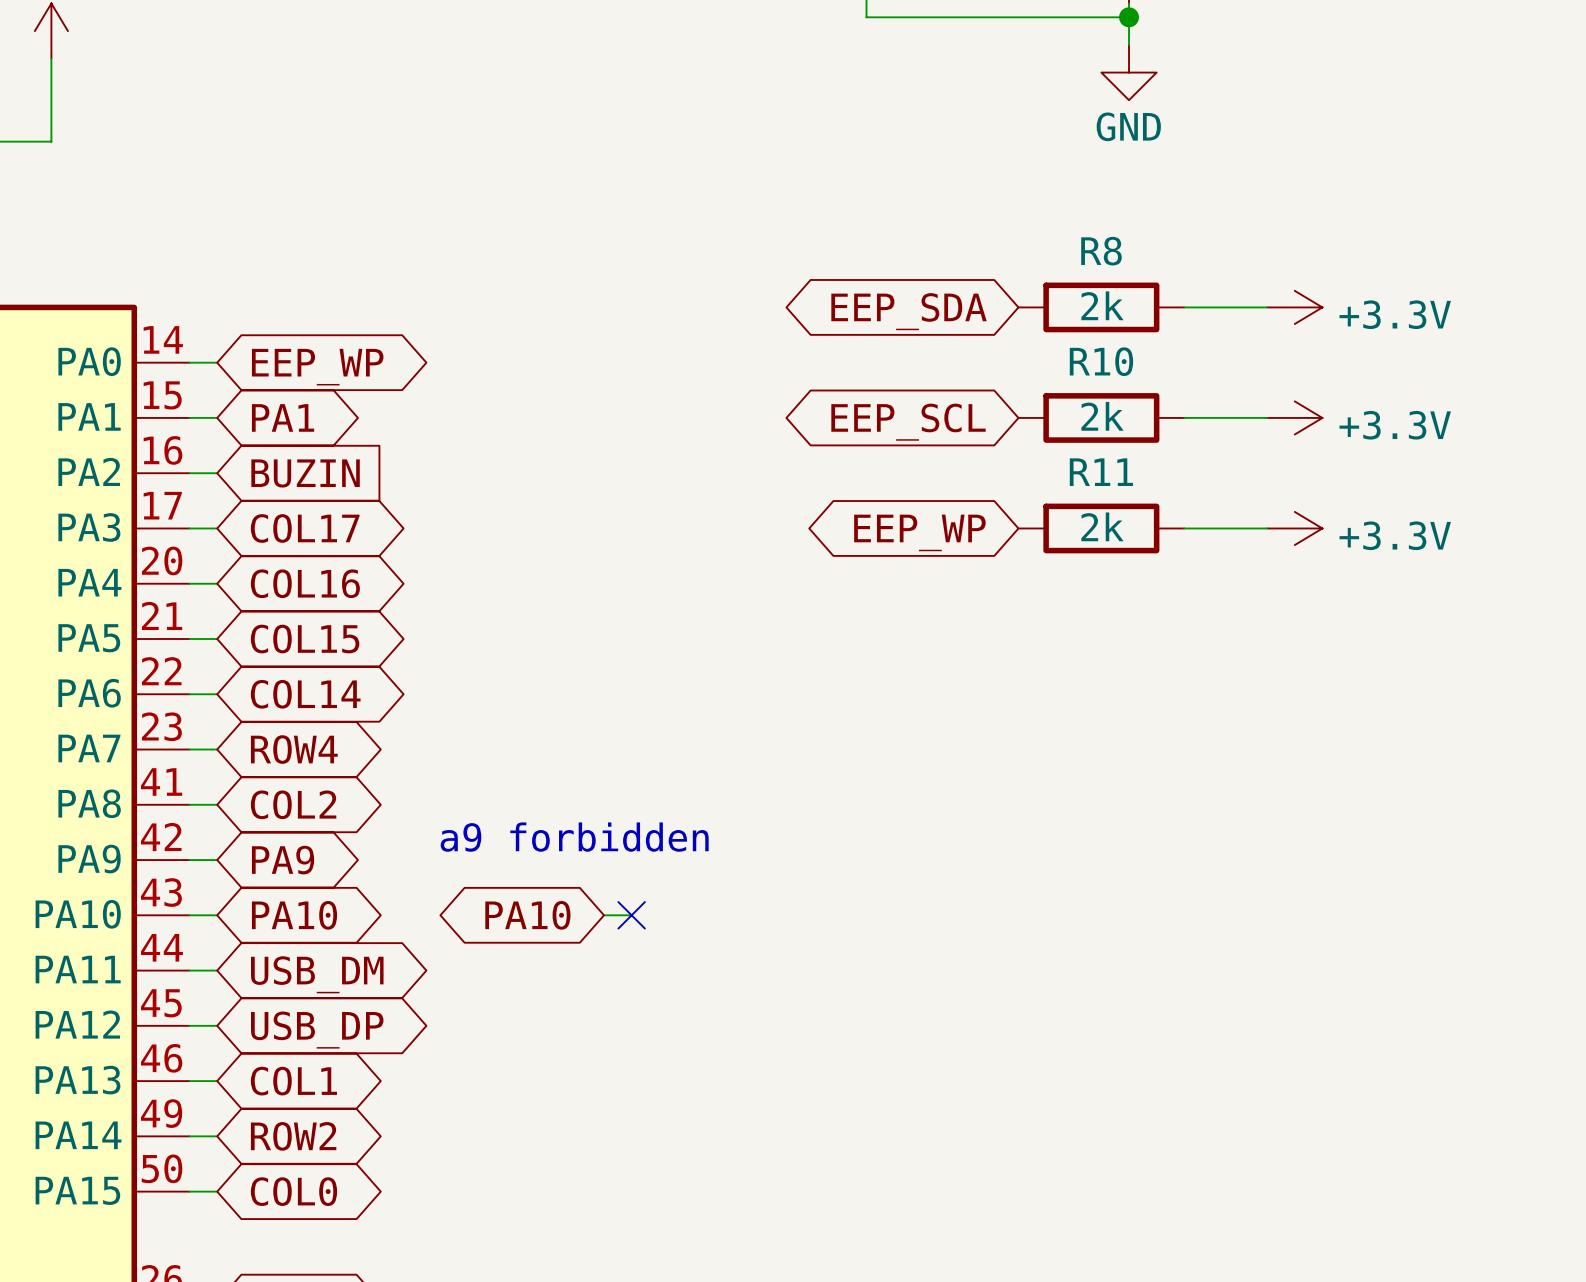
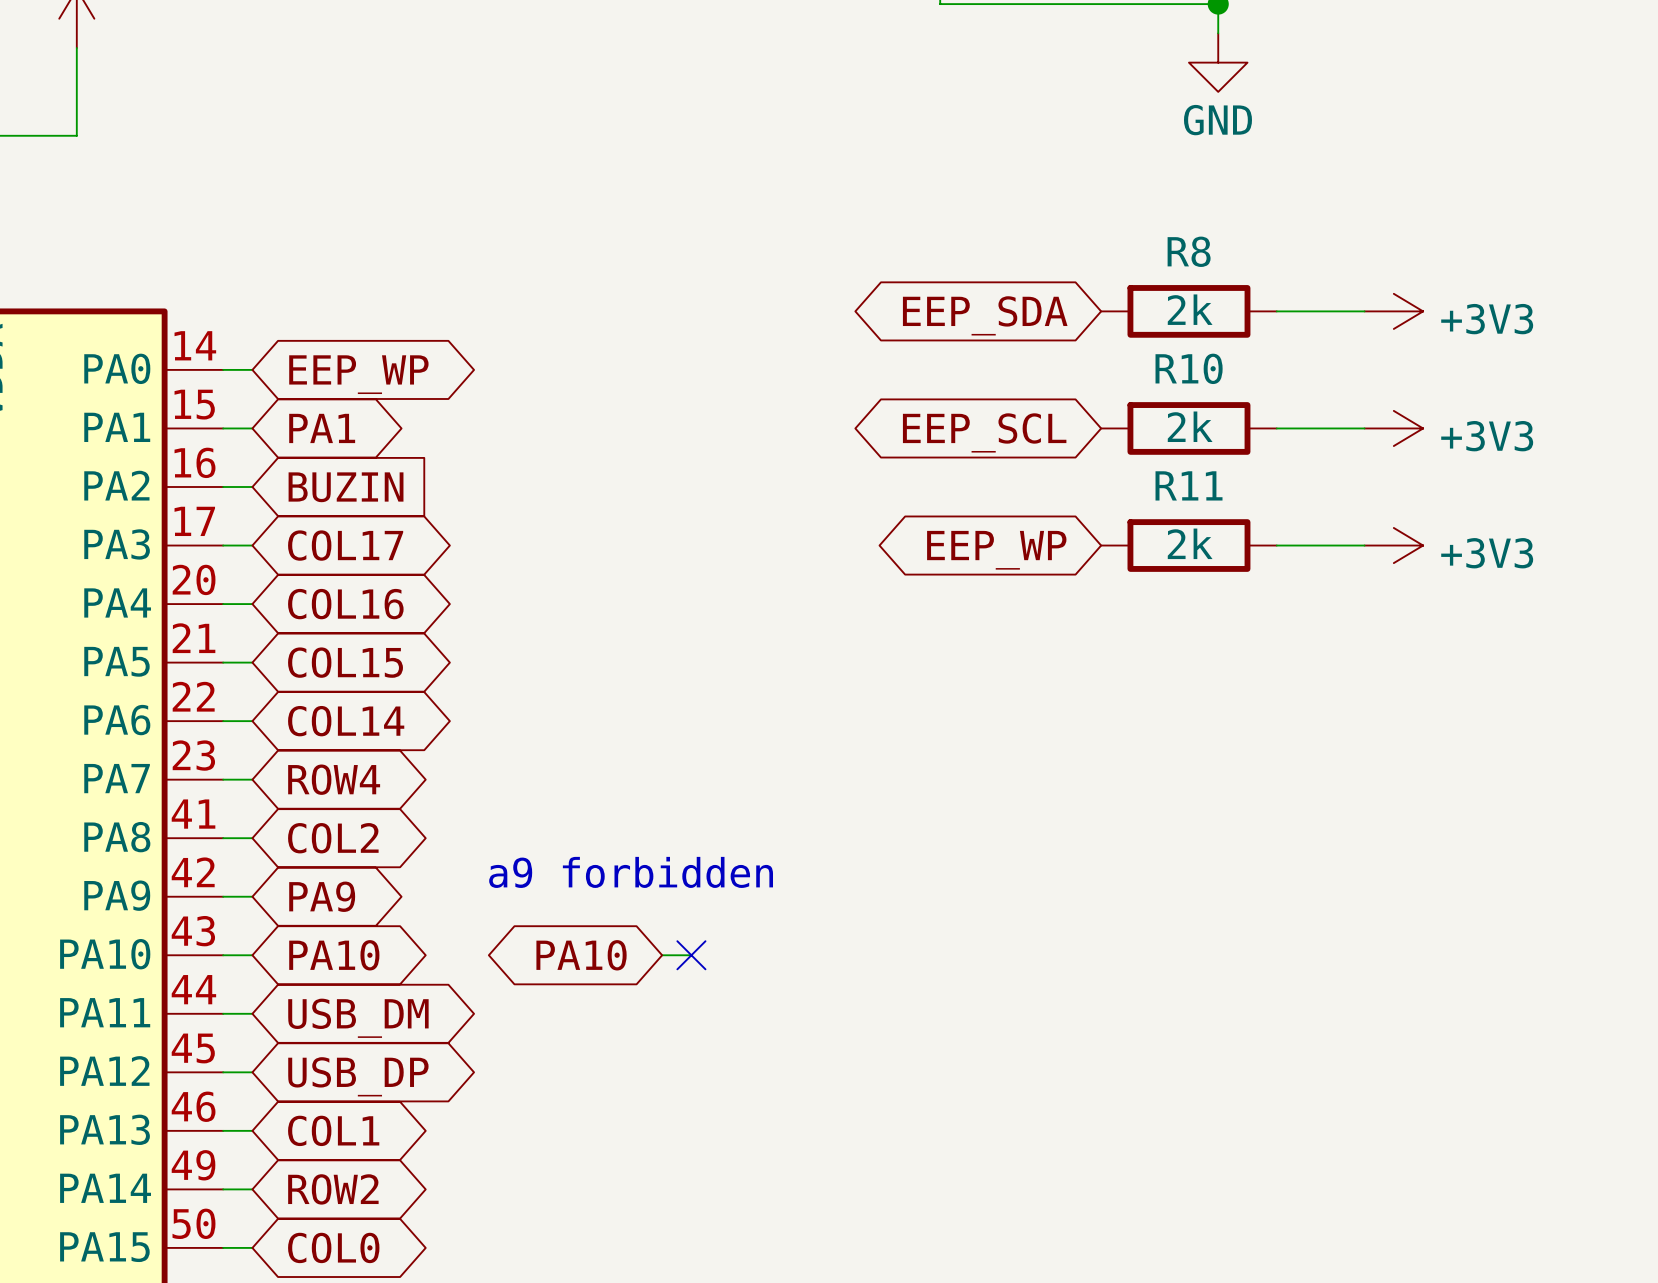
power symbol: +3.3V (1294, 307) -> +3V3 (1393, 311)
power symbol: +3.3V (1294, 417) -> +3V3 (1393, 428)
power symbol: +3.3V (1294, 528) -> +3V3 (1393, 545)

